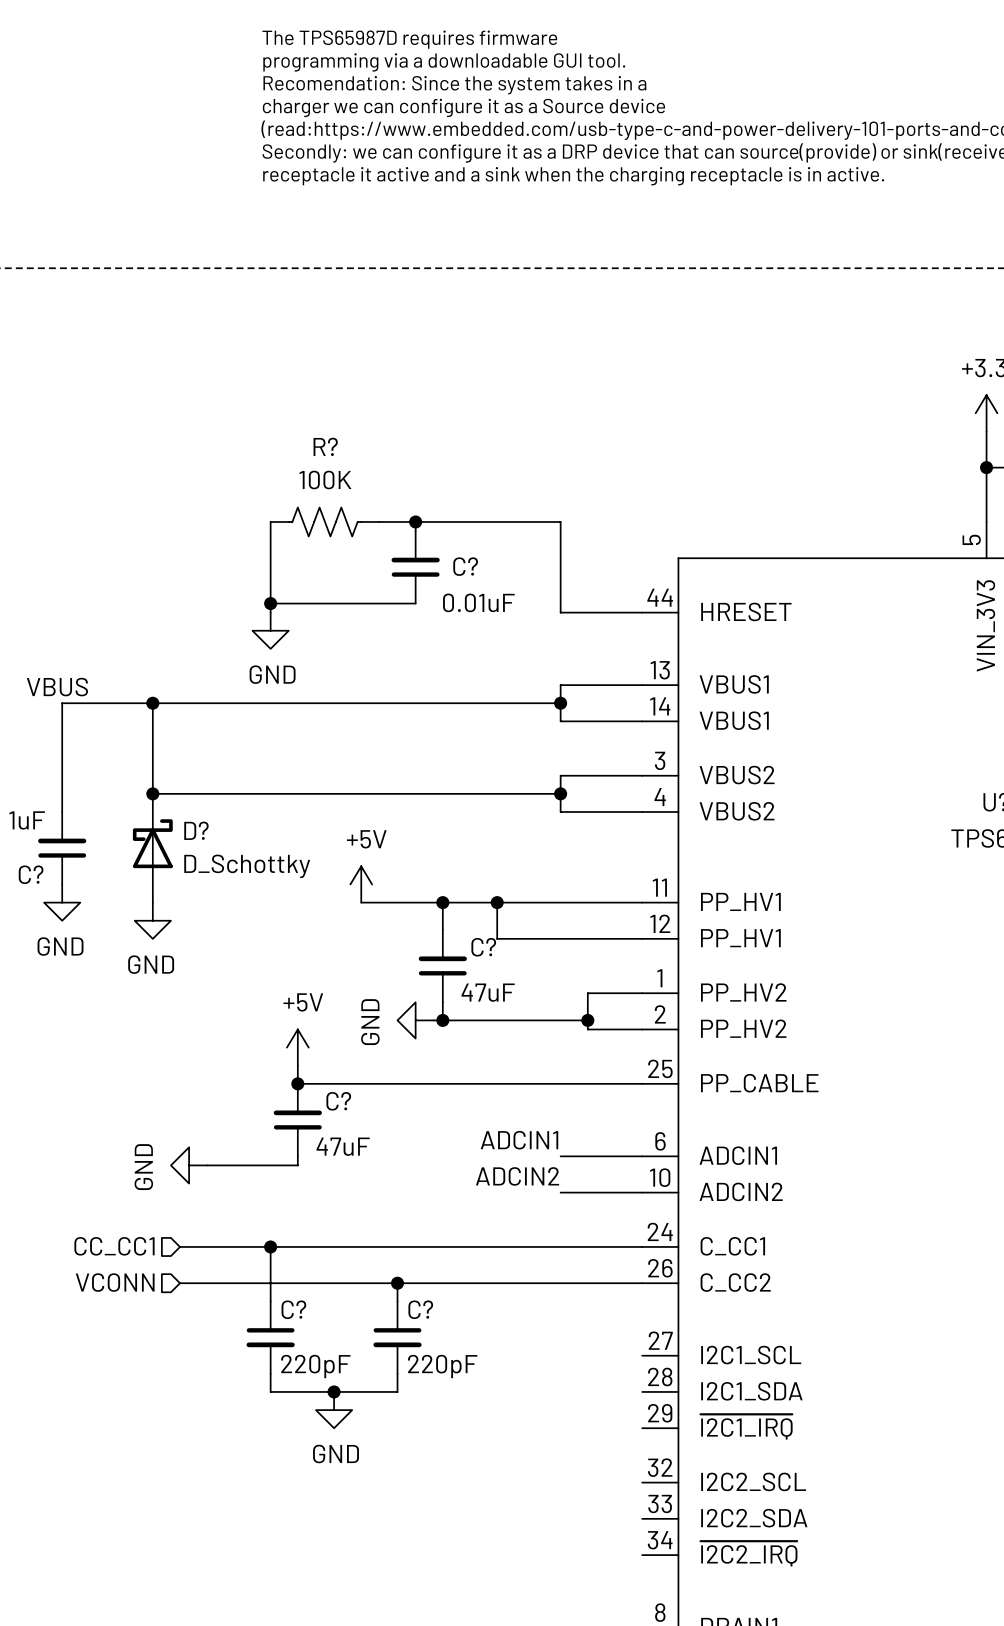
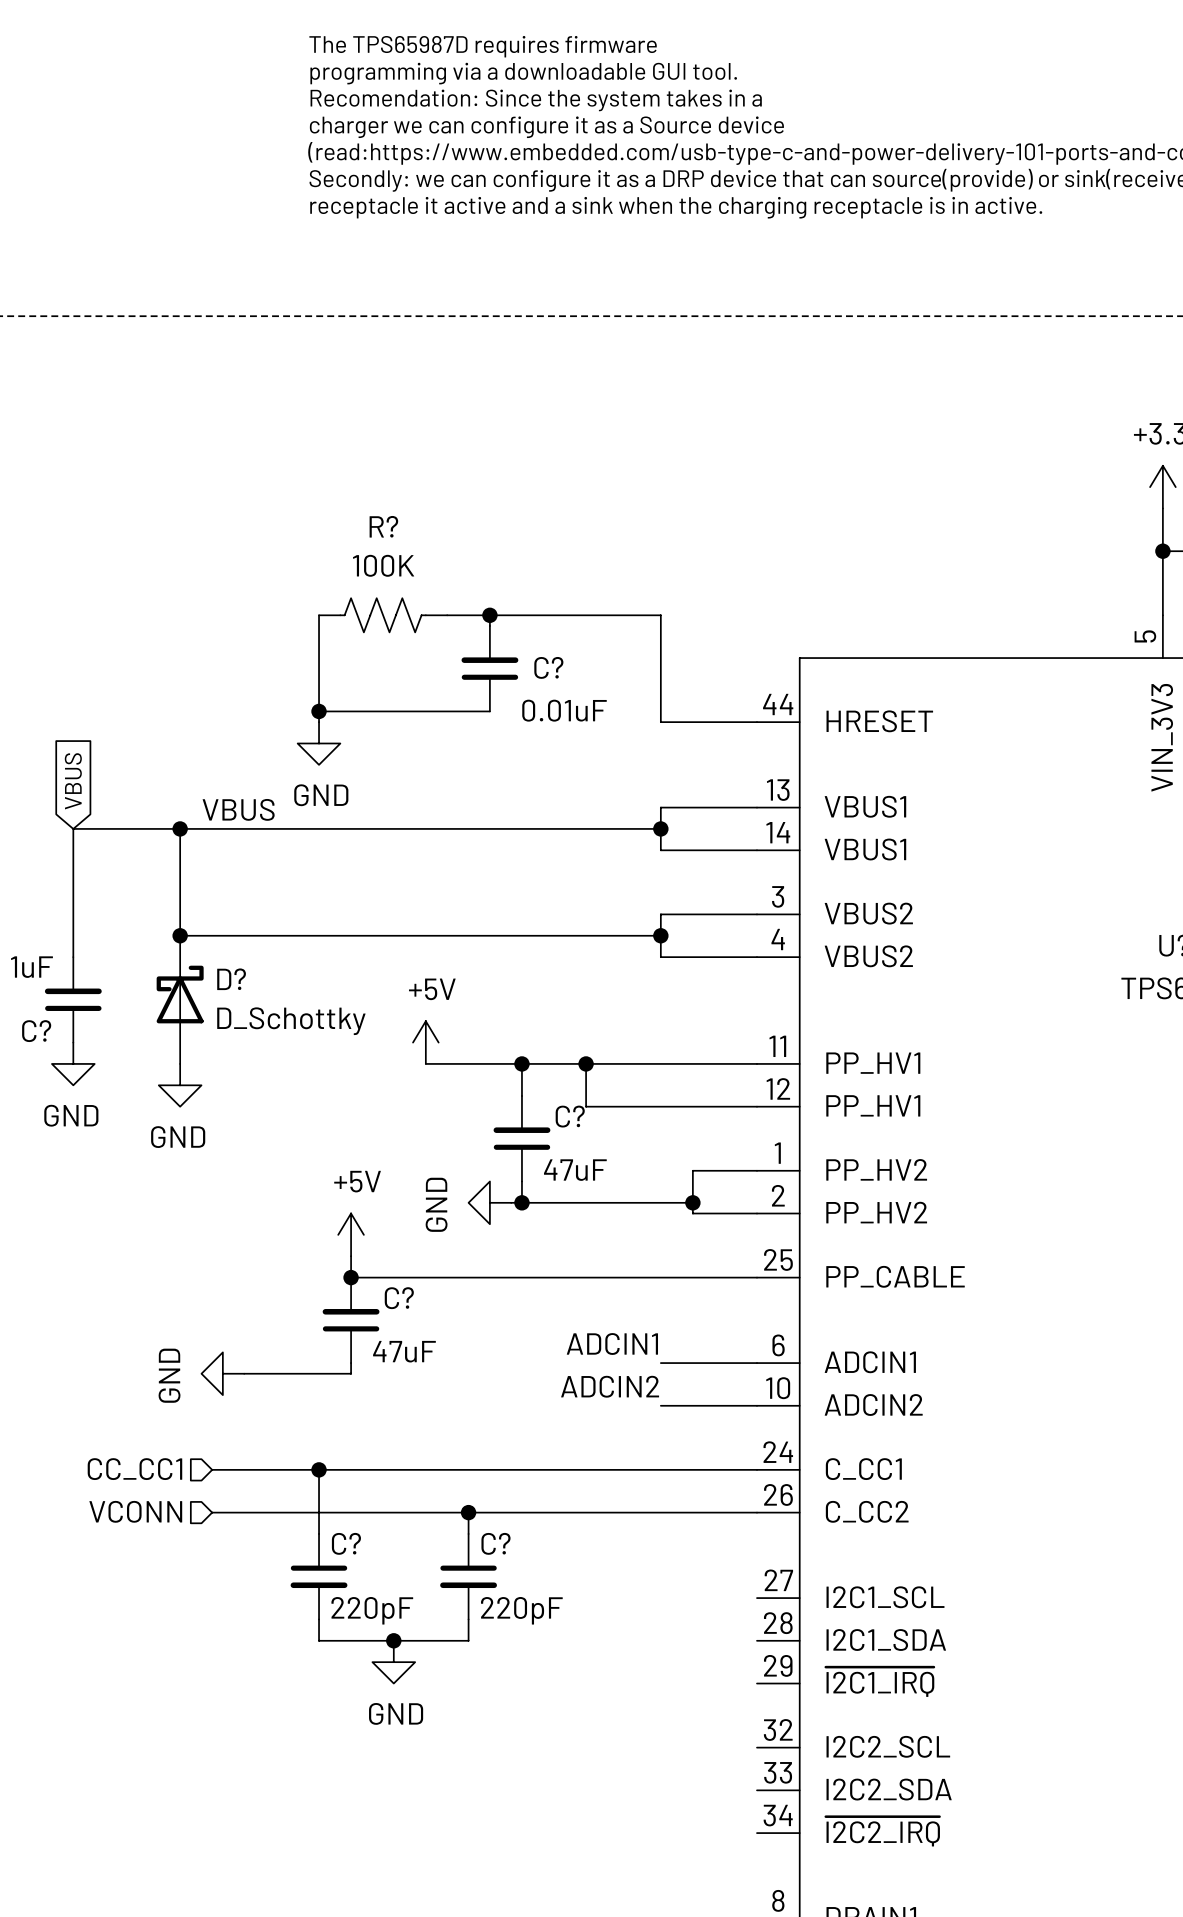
global label: none -> VBUS (73, 781)
label position: VBUS (57, 687) -> VBUS (238, 809)

